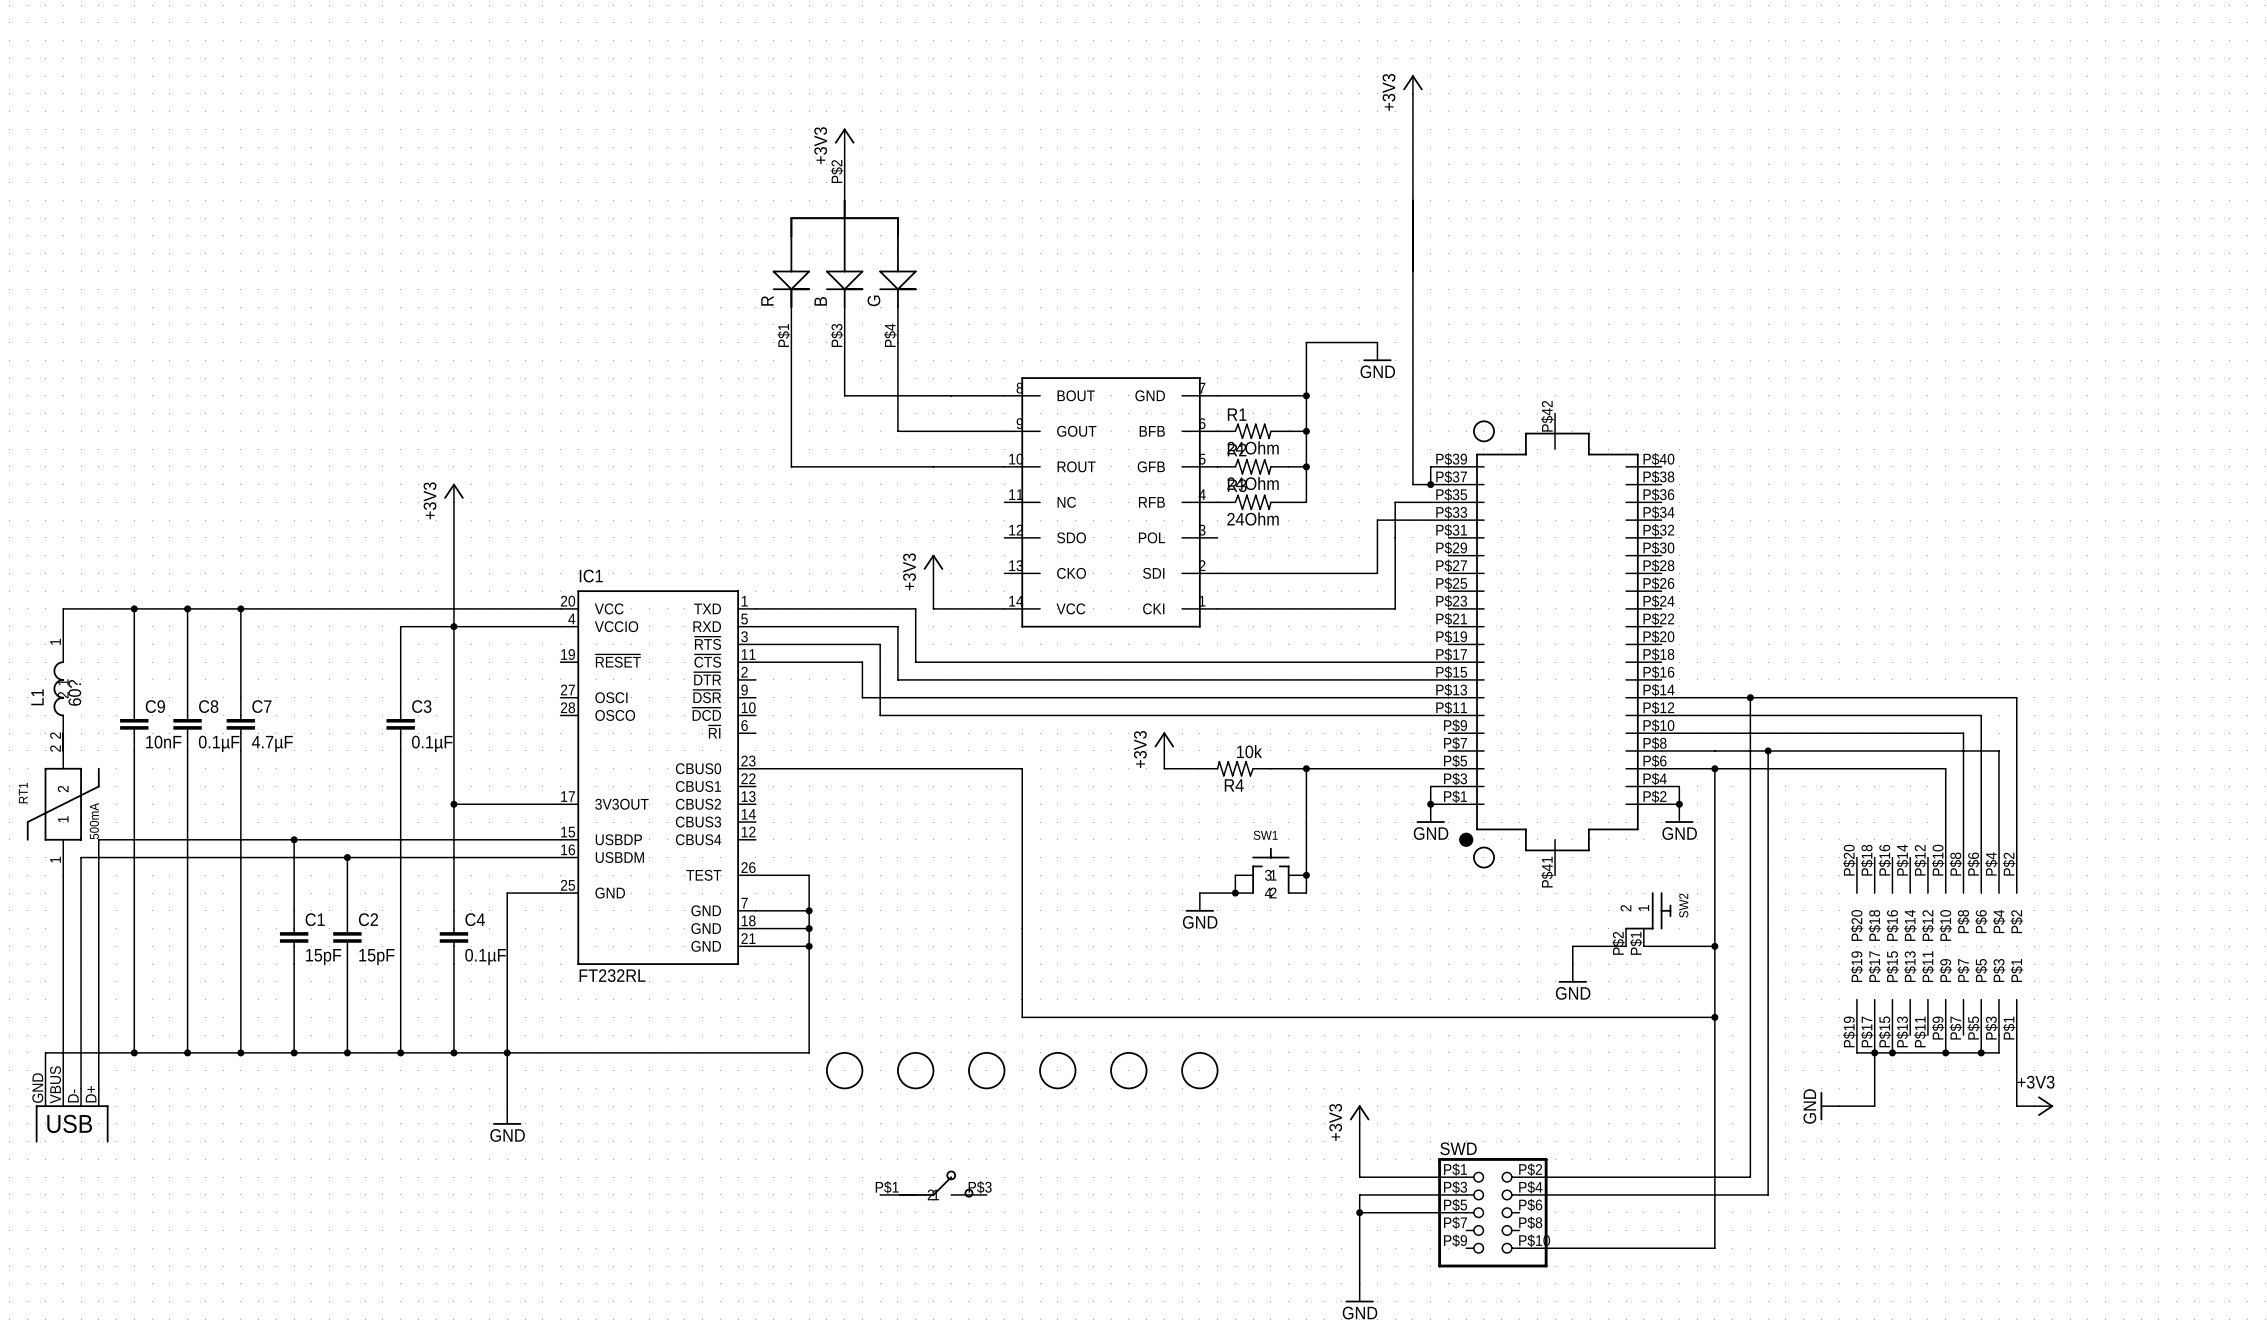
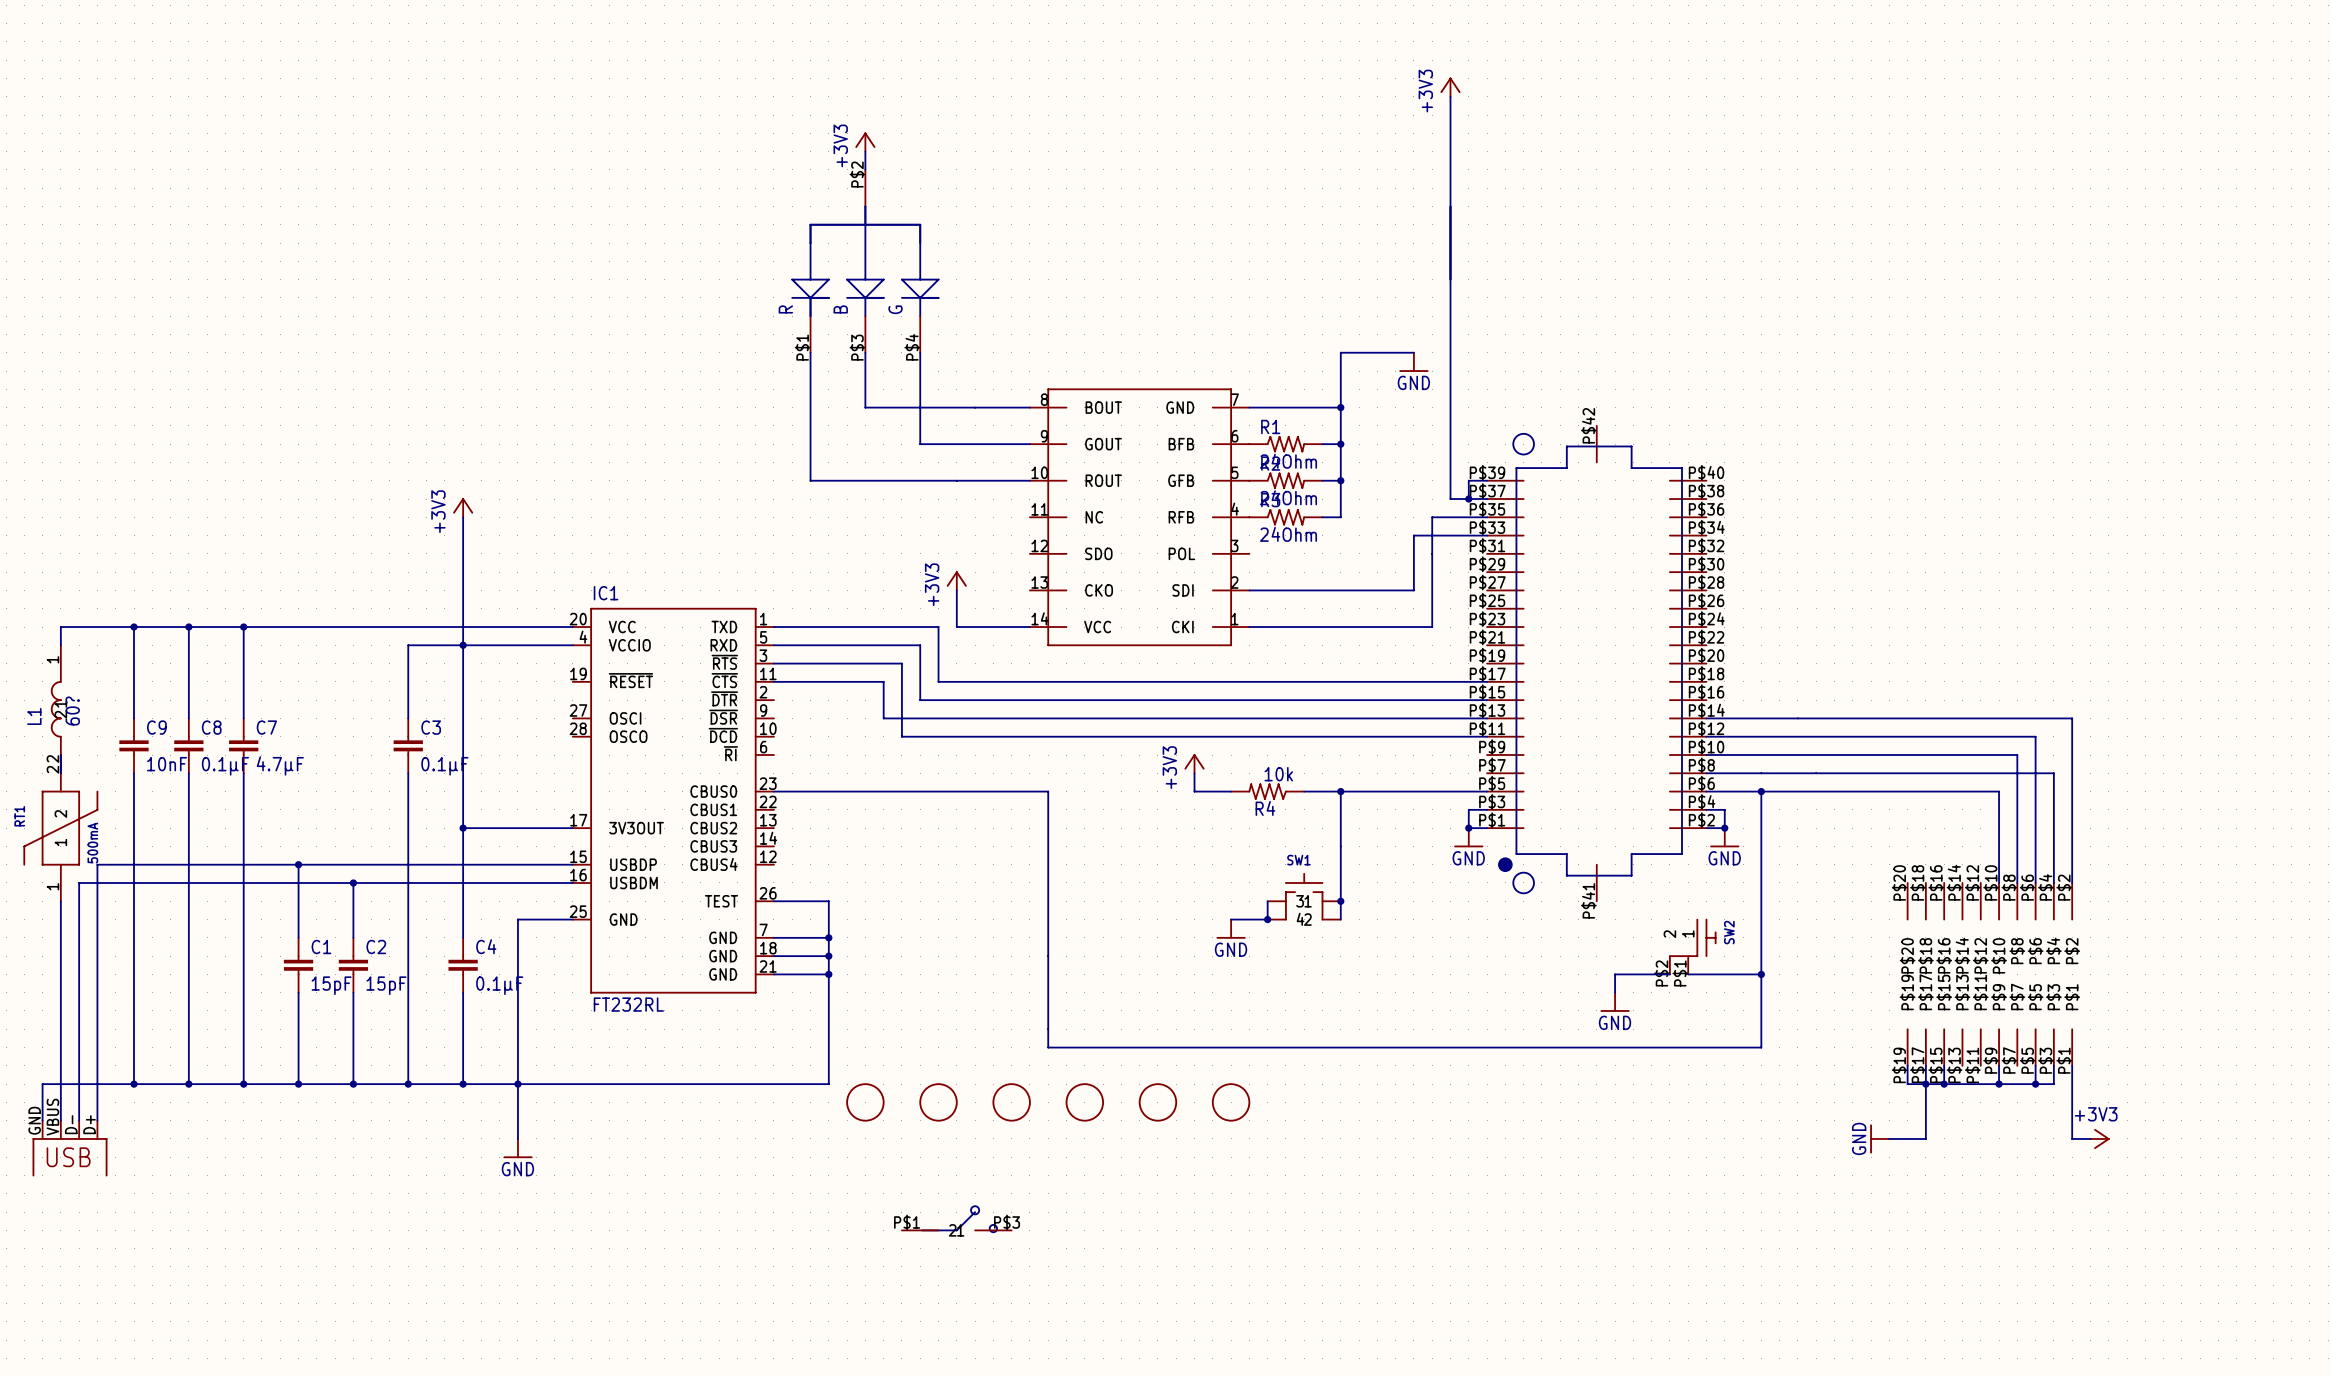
wire: (1750, 697) (1750, 1177) (1519, 1177) -> none
junction: (1750, 697) -> none
wire: (1768, 750) (1768, 1194) (1519, 1194) -> none
junction: (1768, 750) -> none
wire: (1714, 1017) (1714, 1248) (1519, 1248) -> none
junction: (1714, 1017) -> none
power symbol: +3V3 (1359, 1114) -> none
wire: (1359, 1123) (1359, 1177) (1466, 1177) -> none
wire: (1466, 1194) (1359, 1194) (1359, 1283) -> none
wire: (1359, 1212) (1466, 1212) -> none
junction: (1359, 1212) -> none
SWD: (1492, 1212) -> none
power symbol: GND (1359, 1293) -> none

